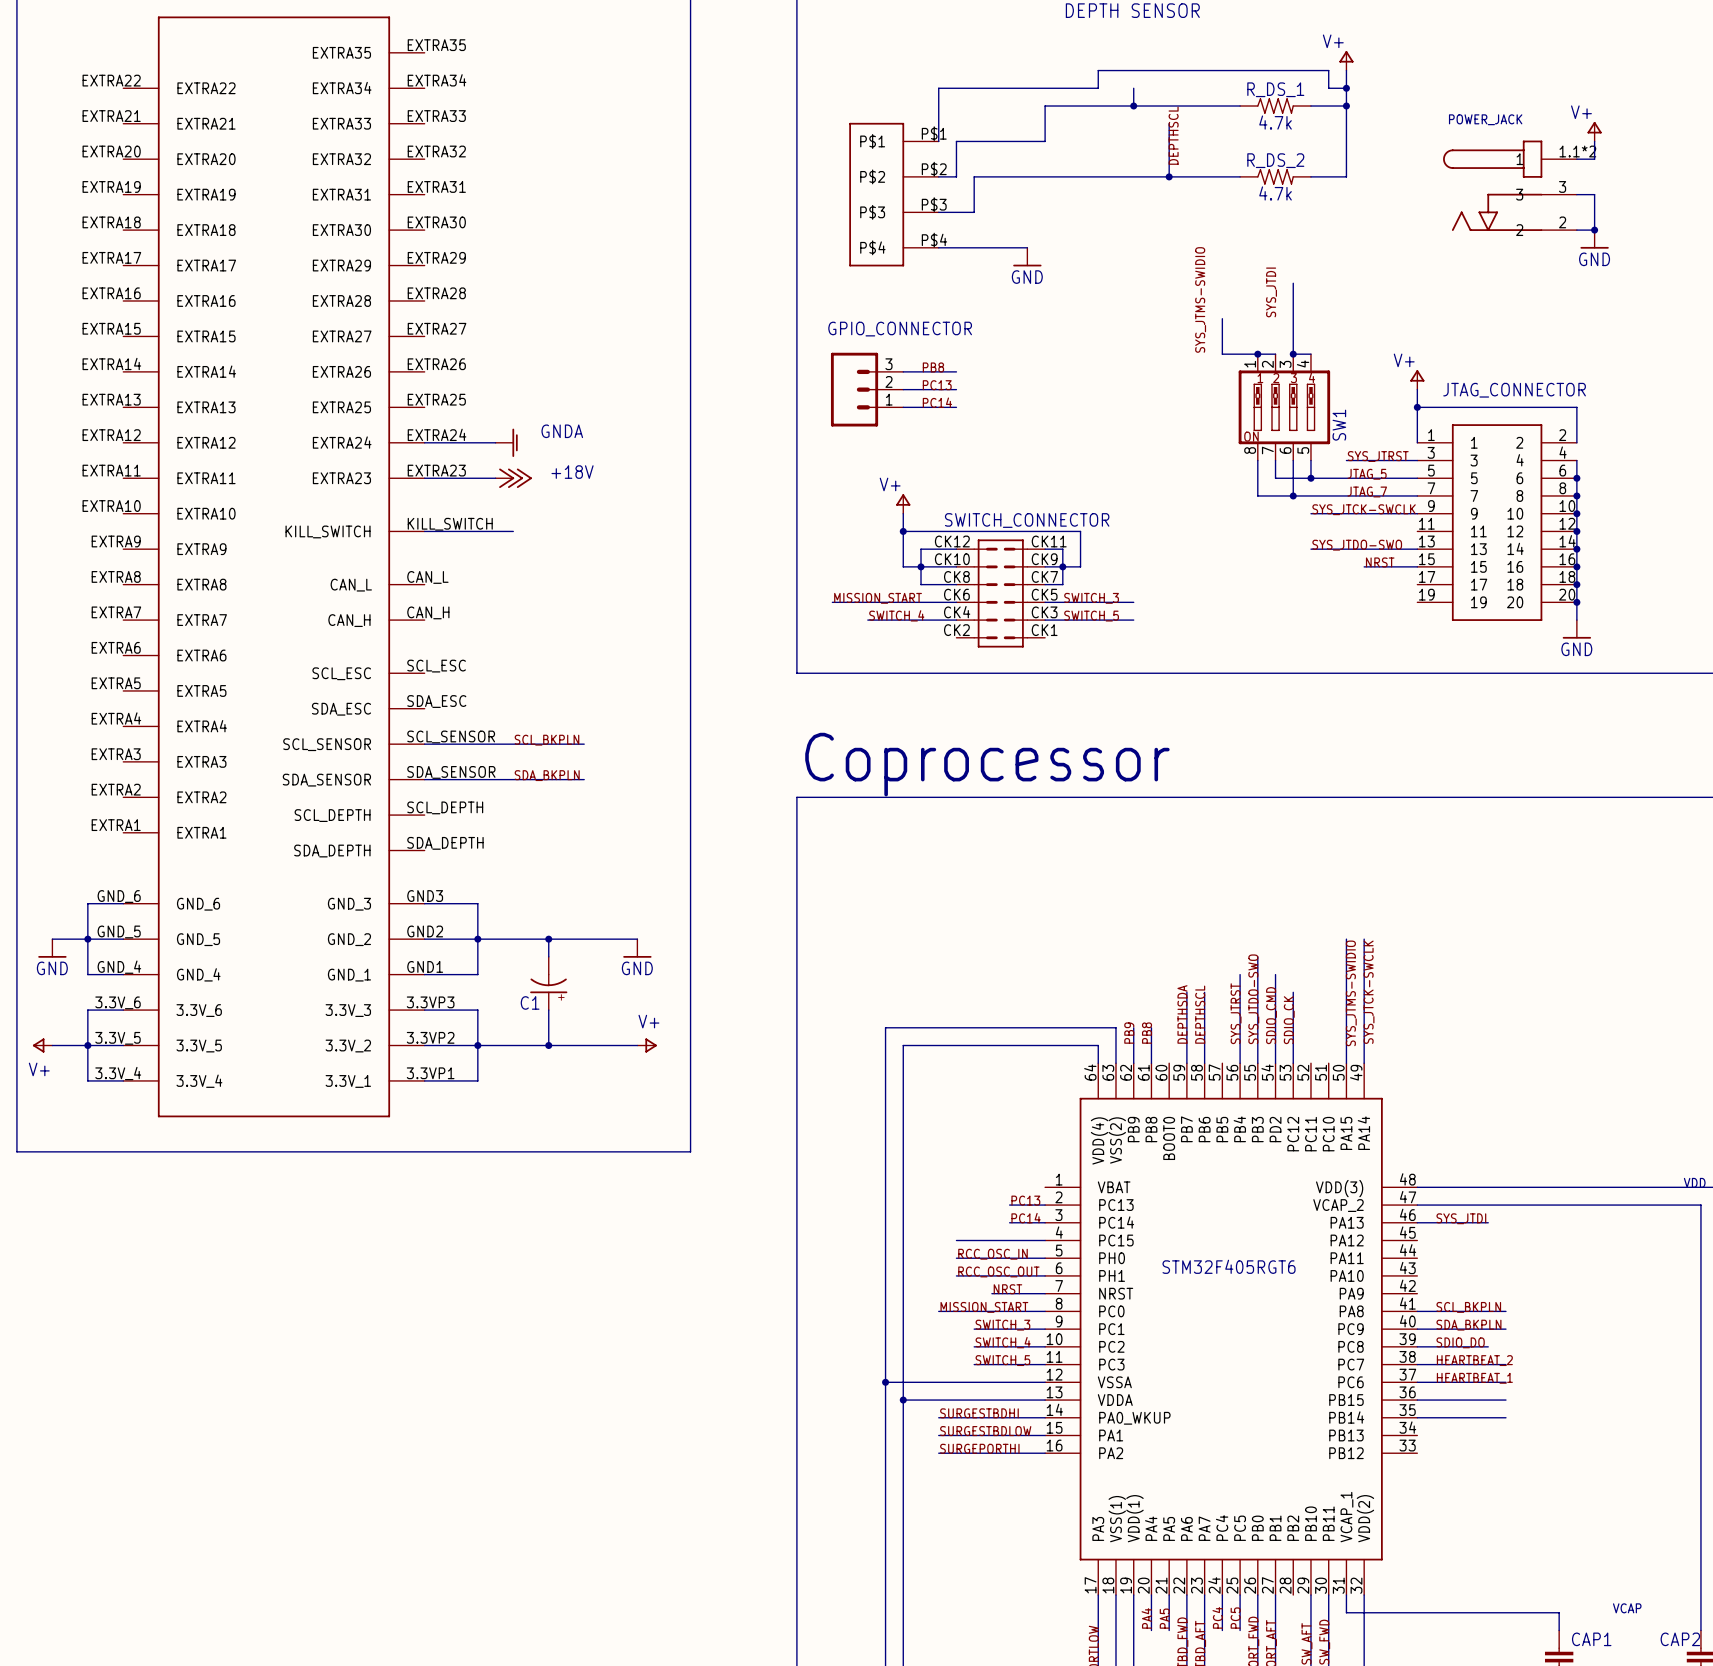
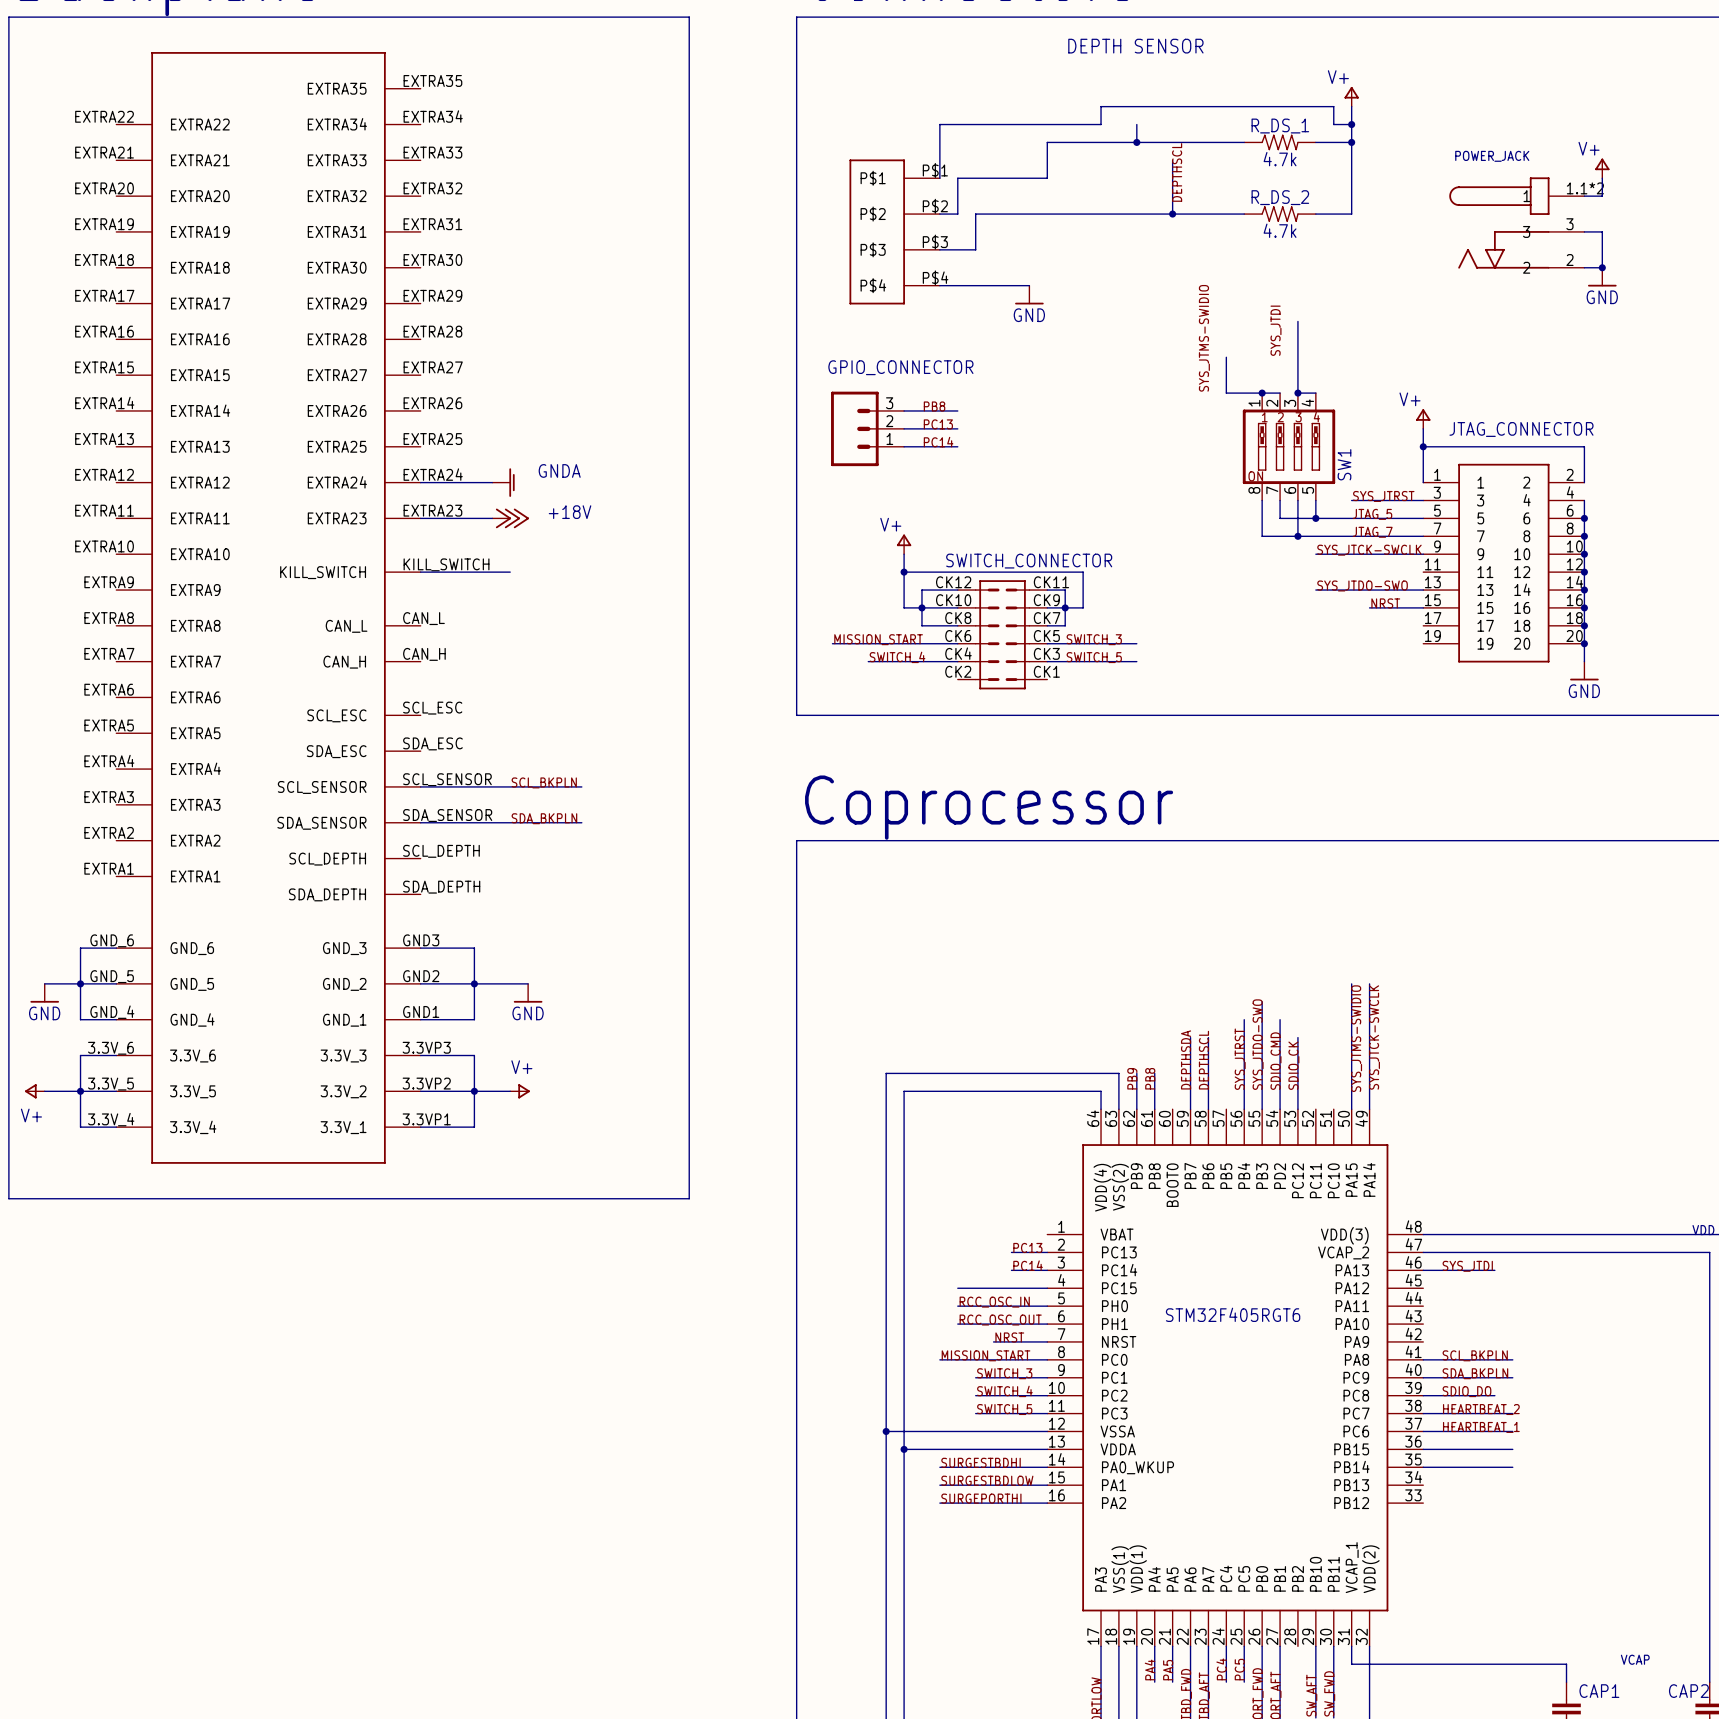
wire: (531, 939) (637, 939) -> none
wire: (548, 939) (548, 956) -> none
junction: (548, 939) -> none
power symbol position: GND (637, 948) -> GND (528, 993)
C1: (548, 983) -> none
wire: (548, 1010) (548, 1045) -> none
wire: (513, 1045) (637, 1045) -> none
junction: (548, 1045) -> none
power symbol position: V+ (647, 1045) -> V+ (520, 1091)

